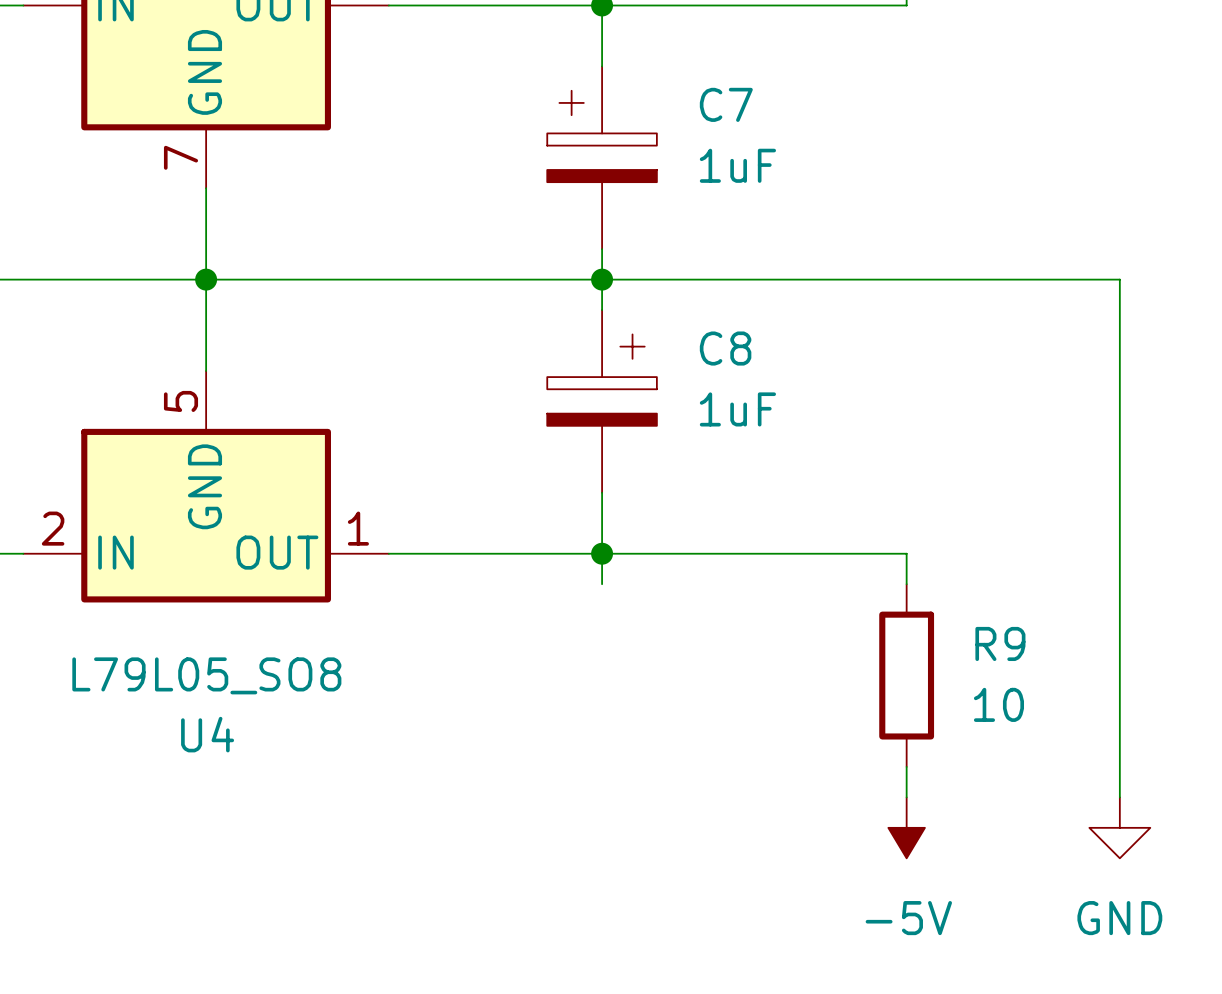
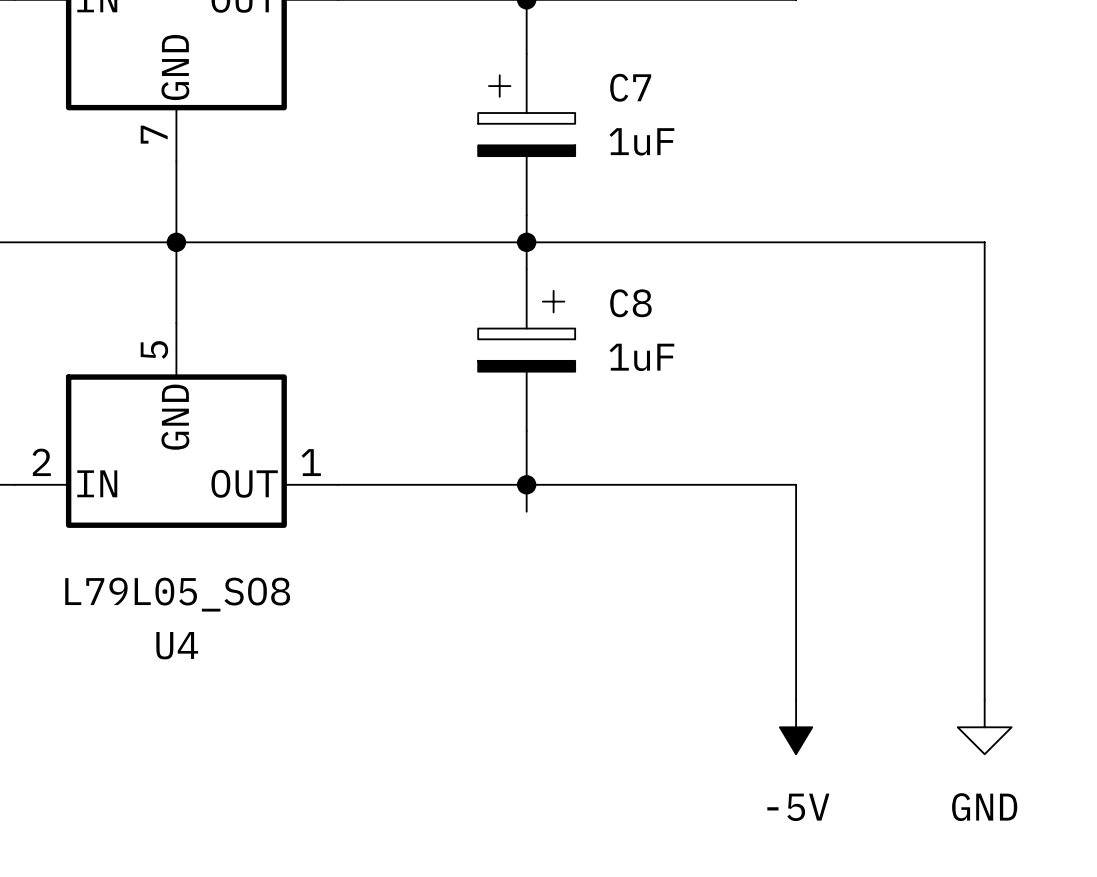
wire: none -> (796, 511) (796, 673)
R9: 10 (906, 675) -> none

